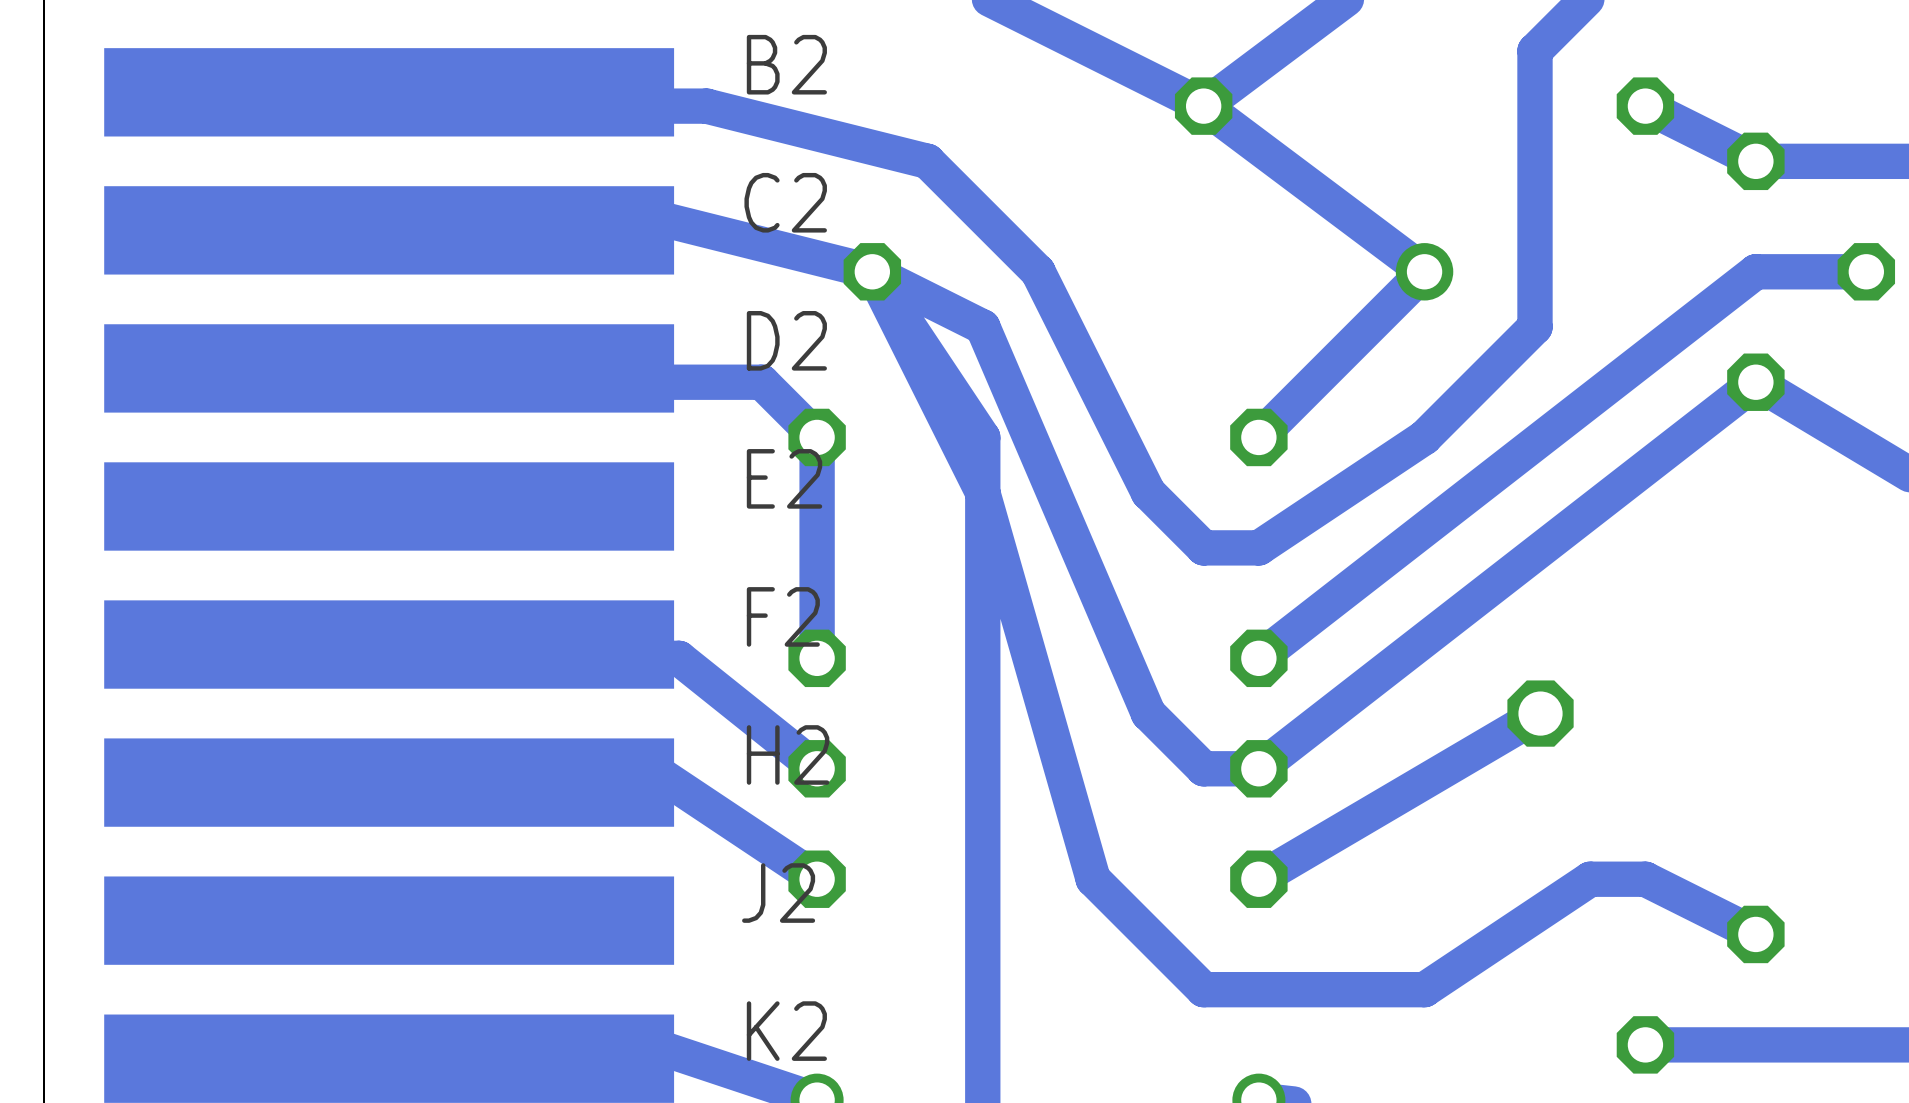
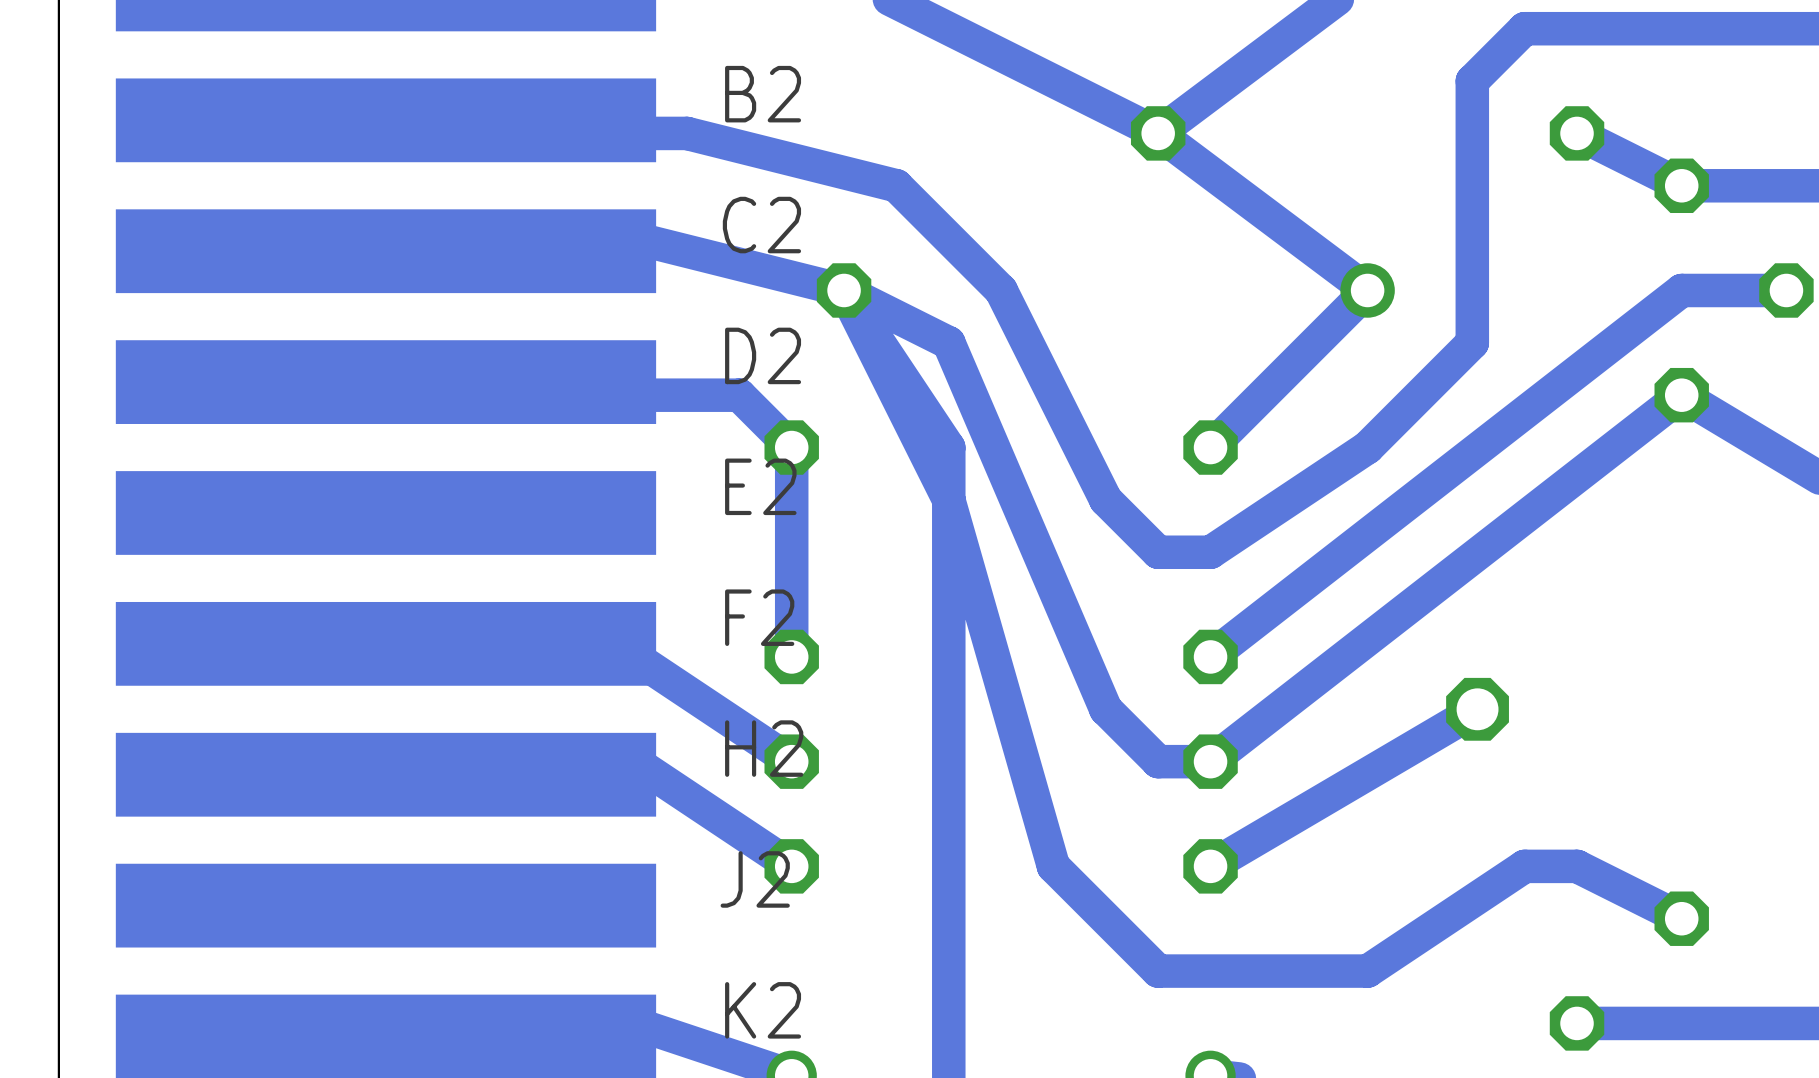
track: (651, 658) (679, 658) (817, 768) -> (634, 656) (791, 761)

